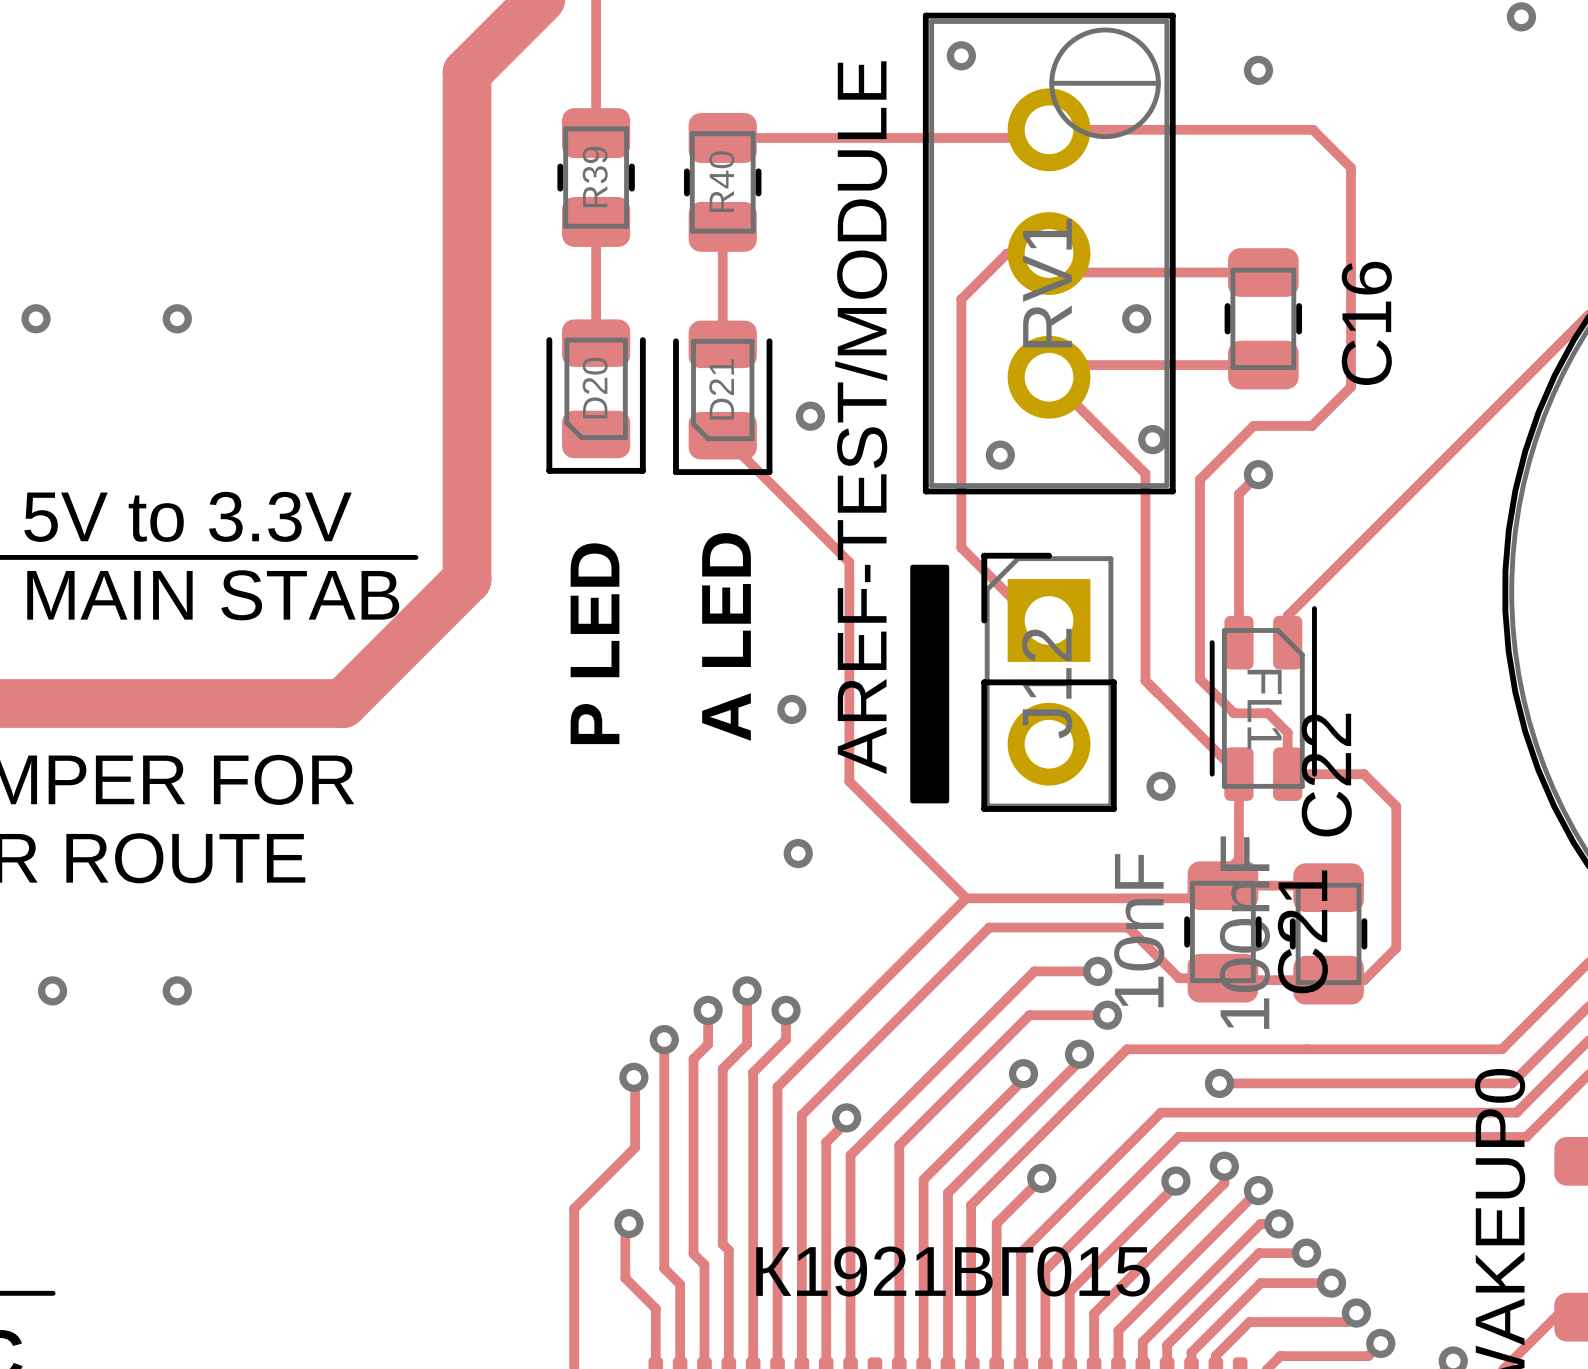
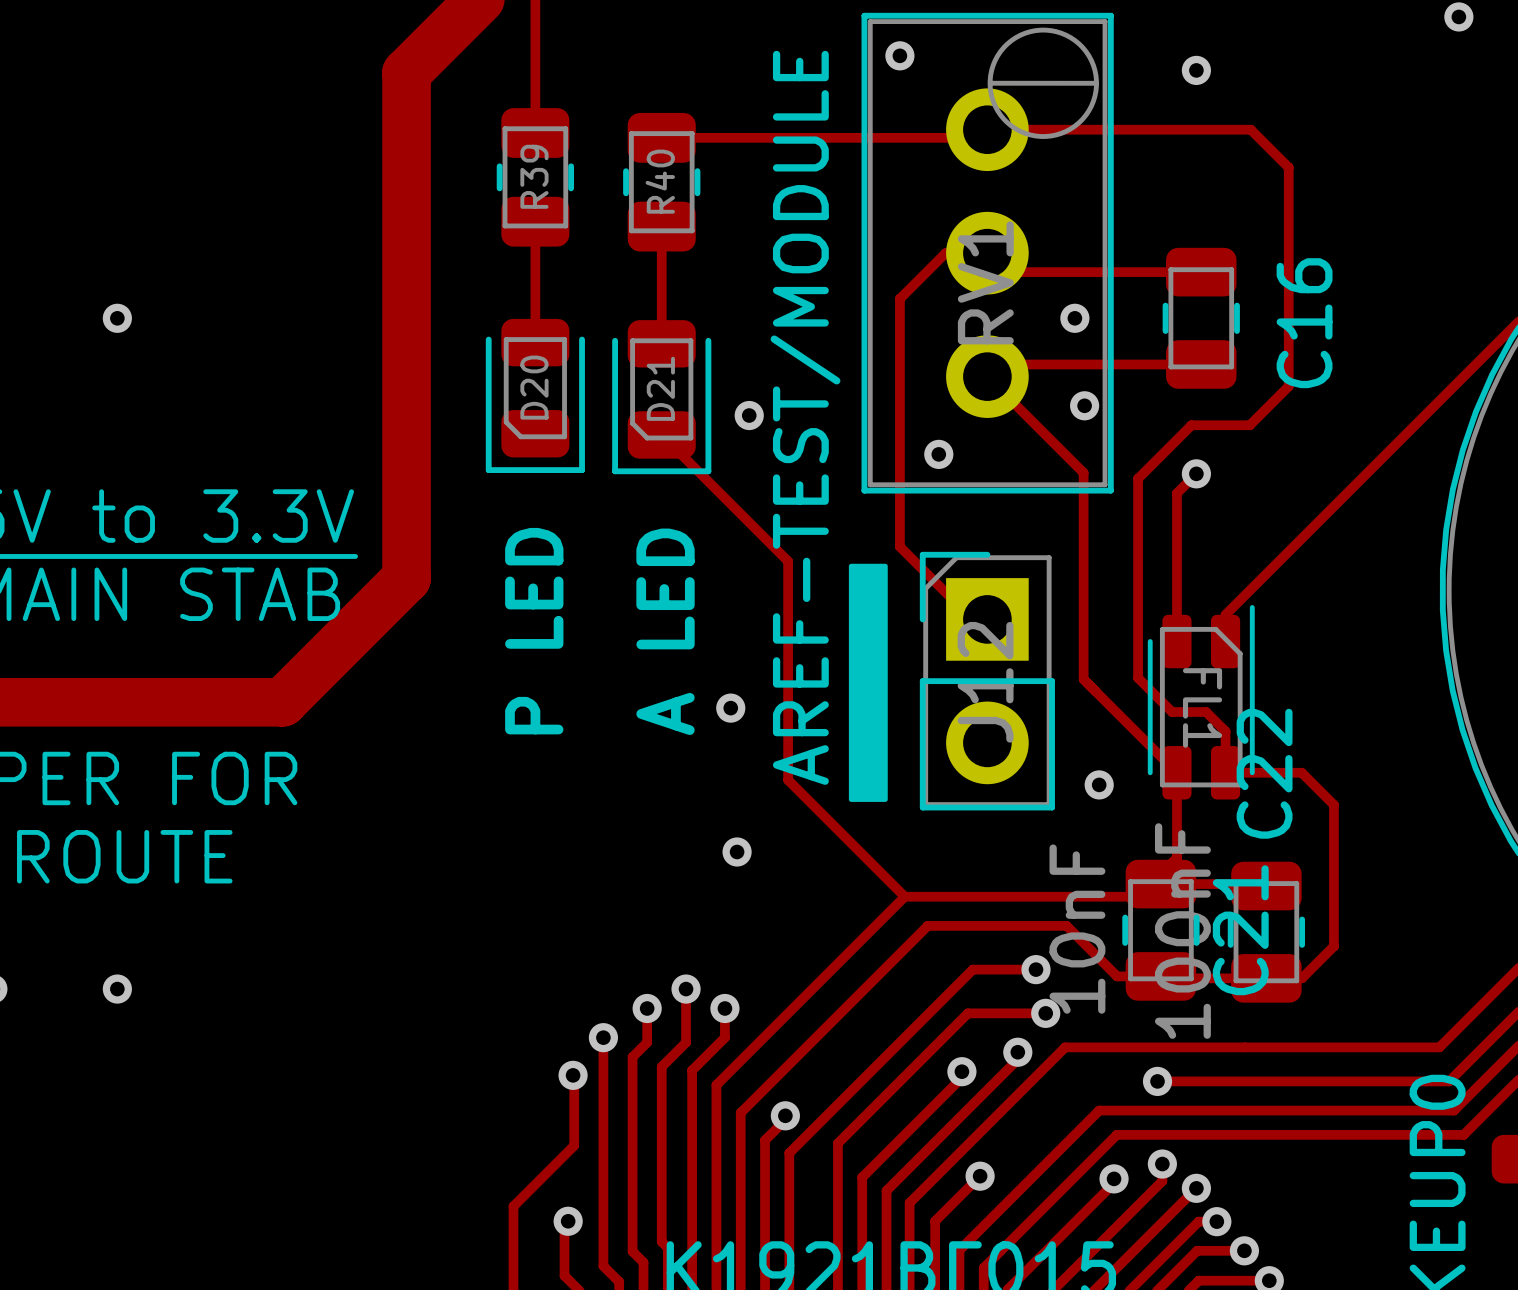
via position: (1152, 439) -> (1084, 405)

